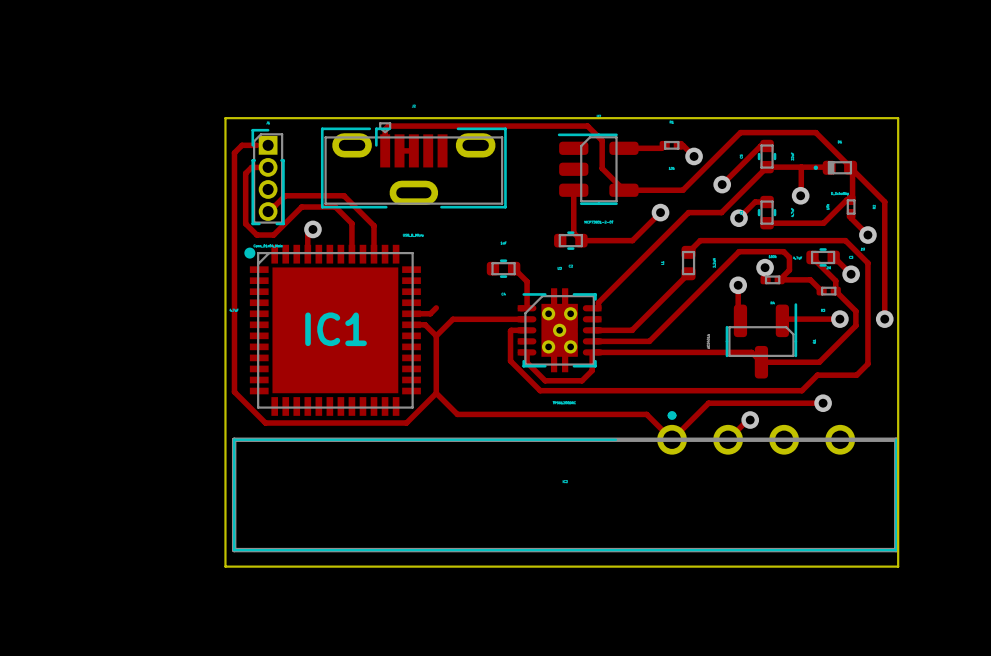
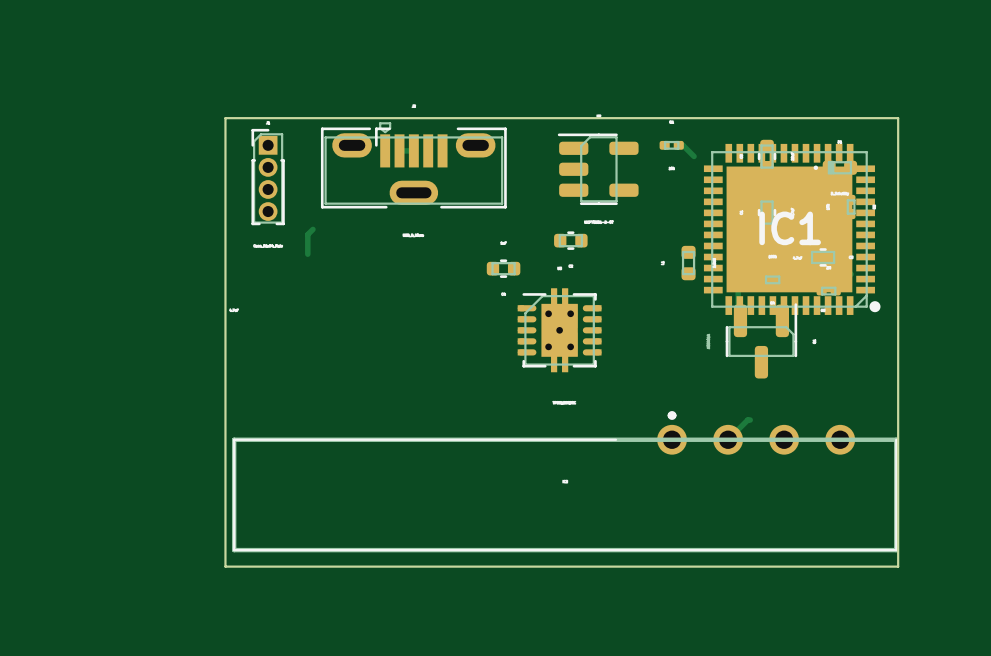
track: (256, 145) (242, 145) (234, 152) (234, 391) (265, 423) (406, 423) (436, 393) -> none
track: (664, 145) (661, 148) (623, 148) -> none
track: (767, 145) (760, 145) (722, 184) -> none
track: (385, 150) (385, 129) (388, 126) (587, 126) (602, 140) (602, 168) (623, 190) (682, 190) (740, 132) (815, 132) (850, 167) -> none
via: (694, 156) -> none
track: (268, 167) (251, 167) (245, 173) (245, 223) (256, 235) (273, 235) (301, 207) (335, 207) (351, 223) (351, 254) -> none
track: (801, 167) (800, 195) -> none
track: (829, 167) (767, 167) (721, 212) (688, 212) (598, 302) (598, 308) -> none
track: (850, 167) (884, 201) (884, 319) -> none
track: (852, 169) (852, 201) -> none
via: (722, 184) -> none
track: (573, 190) (573, 232) (581, 240) (632, 240) (660, 212) -> none
via: (800, 195) -> none
track: (851, 199) (846, 199) (823, 223) (767, 223) -> none
track: (767, 202) (755, 202) (739, 218) -> none
track: (268, 211) (285, 195) (343, 195) (374, 225) (374, 254) -> none
via: (660, 212) -> none
track: (851, 214) (851, 218) (867, 235) -> none
via: (739, 218) -> none
via: (312, 229) -> none
via: (867, 235) -> none
part: (862, 249) -> none
track: (688, 252) (700, 240) (845, 240) (867, 263) (867, 363) (856, 375) (817, 375) (801, 390) (540, 390) (510, 361) (510, 331) (527, 330) -> none
track: (812, 257) (835, 280) (835, 291) (855, 311) (855, 325) (819, 362) (761, 362) (751, 352) (598, 352) -> none
via: (765, 267) -> none
track: (514, 268) (527, 281) (527, 308) -> none
track: (688, 273) (632, 329) -> none
via: (851, 274) -> none
via: (738, 285) -> none
track: (821, 291) (810, 279) (779, 279) (789, 270) (789, 257) (783, 251) (739, 251) (649, 341) (598, 341) -> none
track: (436, 307) (430, 313) (411, 313) -> none
track: (520, 319) (452, 319) (436, 335) -> none
track: (839, 319) (784, 319) (782, 320) -> none
via: (839, 319) -> none
via: (884, 319) -> none
track: (411, 324) (425, 324) (436, 335) -> none
IC1 rotation: 0° (332, 330) -> 180° (792, 229)
IC1 position: (332, 330) -> (792, 229)
track: (592, 330) (632, 330) -> none
track: (436, 335) (436, 393) -> none
track: (527, 352) (527, 362) (545, 380) (582, 380) (592, 370) (592, 352) -> none
track: (436, 393) (457, 414) (646, 414) (672, 439) (708, 403) (823, 403) -> none
via: (823, 403) -> none
via: (750, 420) -> none

